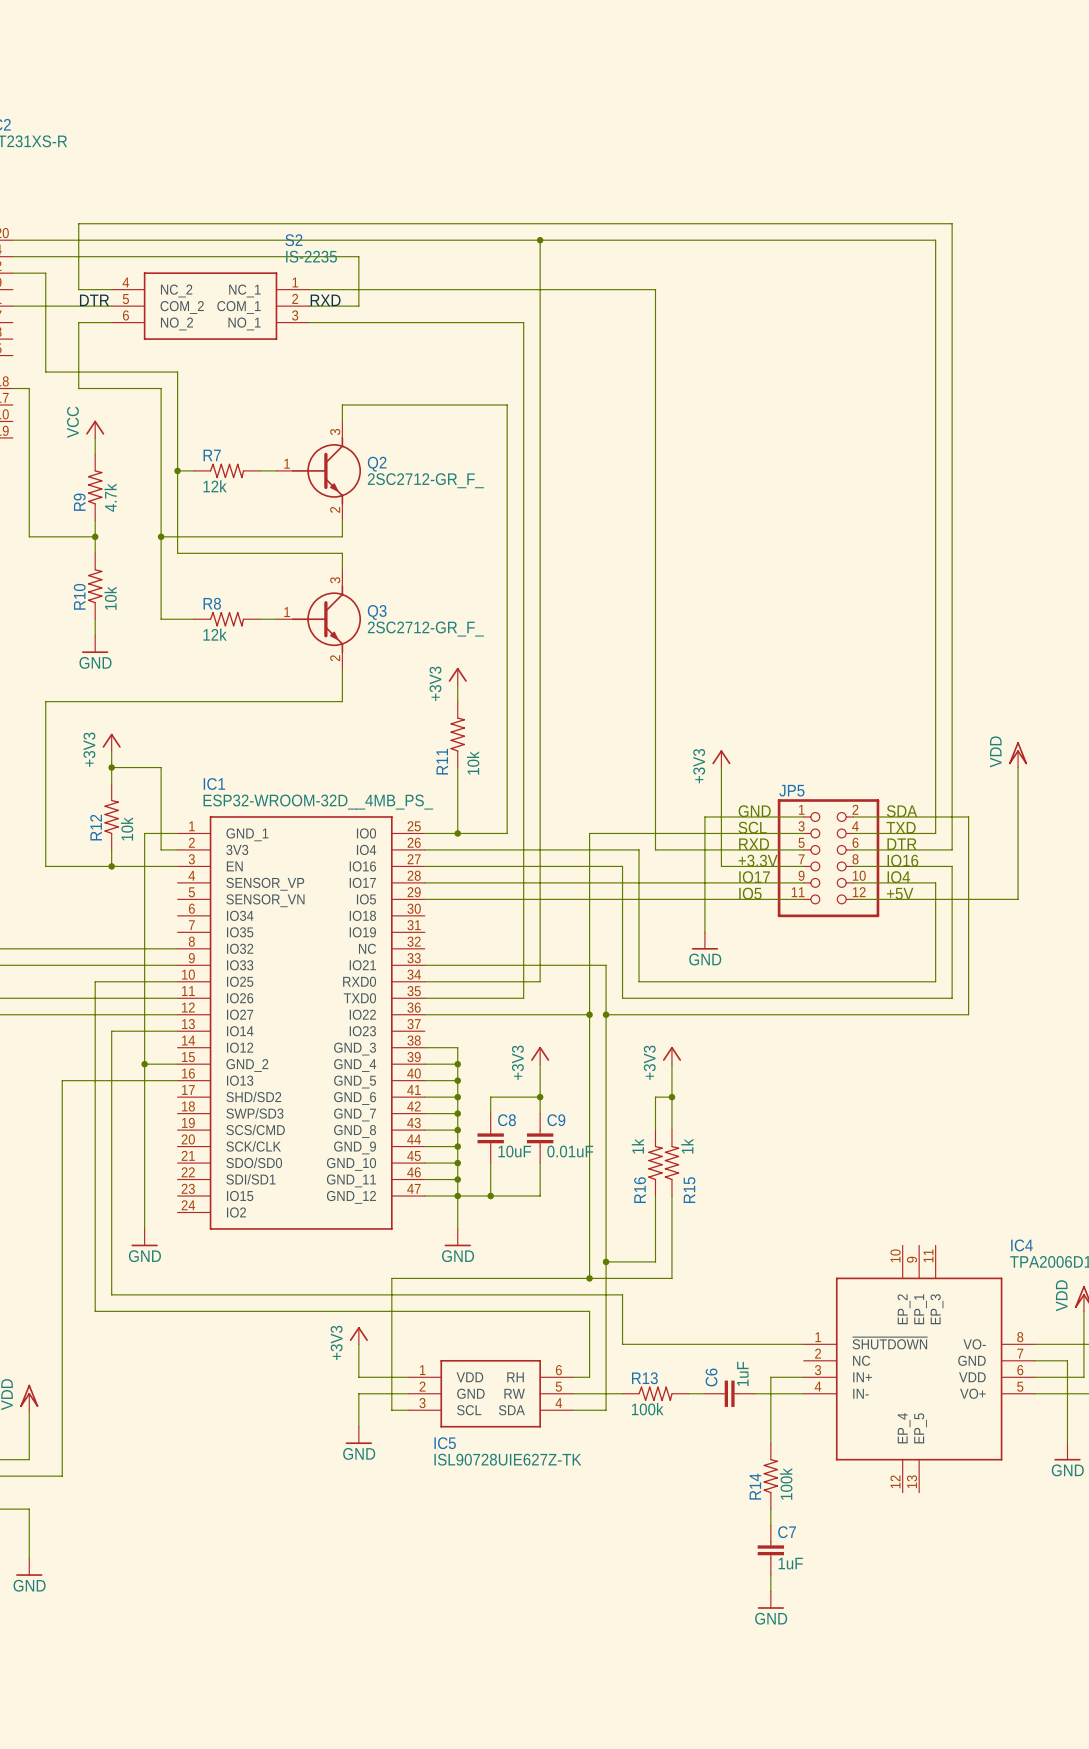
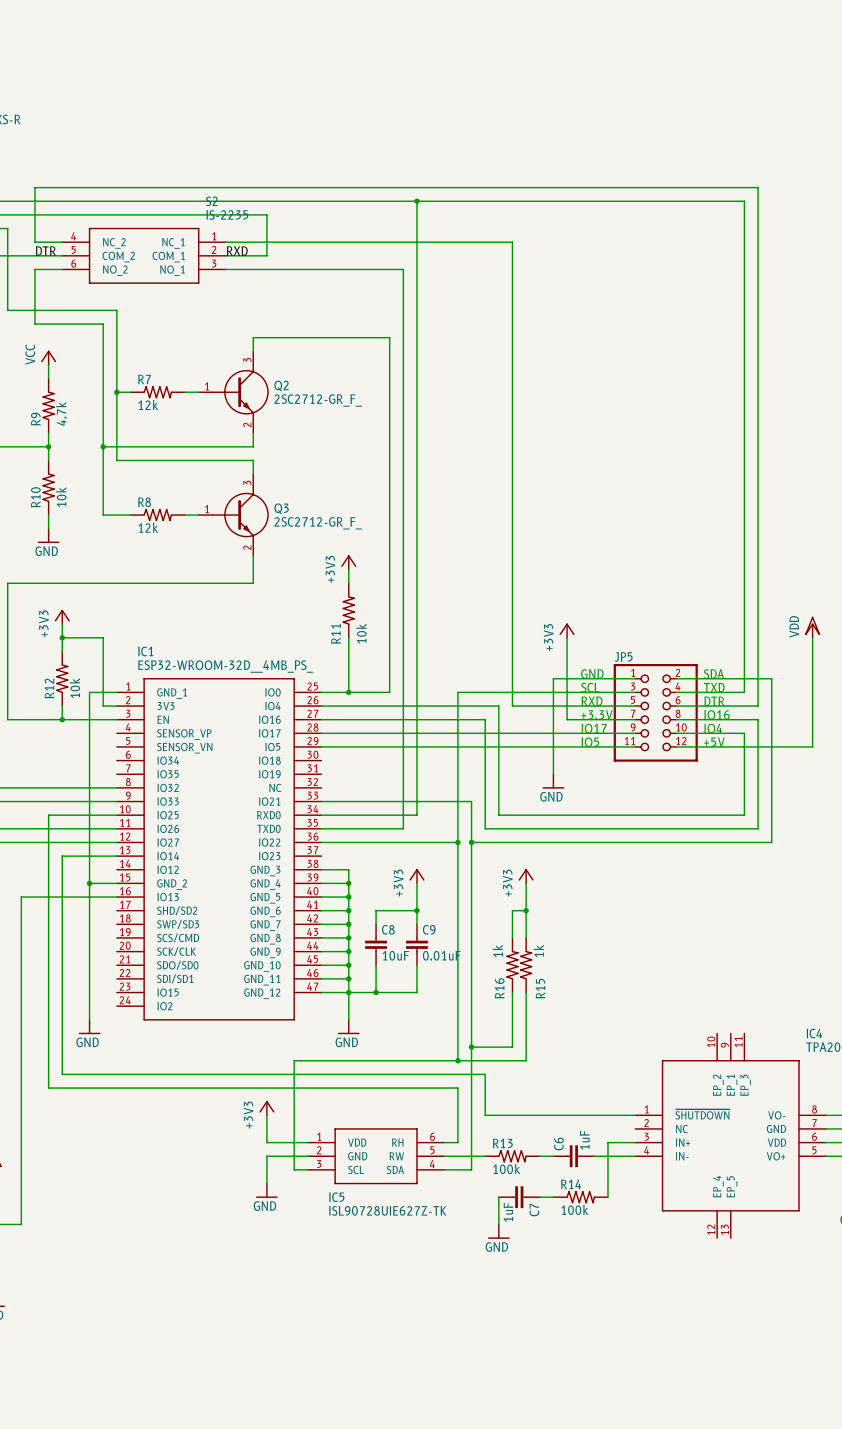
wire: none -> (498, 1197) (498, 1224)
wire: none -> (539, 1197) (553, 1197)
R14 rotation: 0° (770, 1476) -> 90° clockwise (580, 1197)
R14 position: (770, 1476) -> (580, 1197)
power symbol: none -> GND (498, 1231)
wire: (770, 1509) (770, 1525) -> none
C7 rotation: 0° (770, 1550) -> 90° clockwise (519, 1197)
C7 position: (770, 1550) -> (519, 1197)
wire: (770, 1575) (770, 1591) -> none
power symbol: GND (770, 1600) -> none

